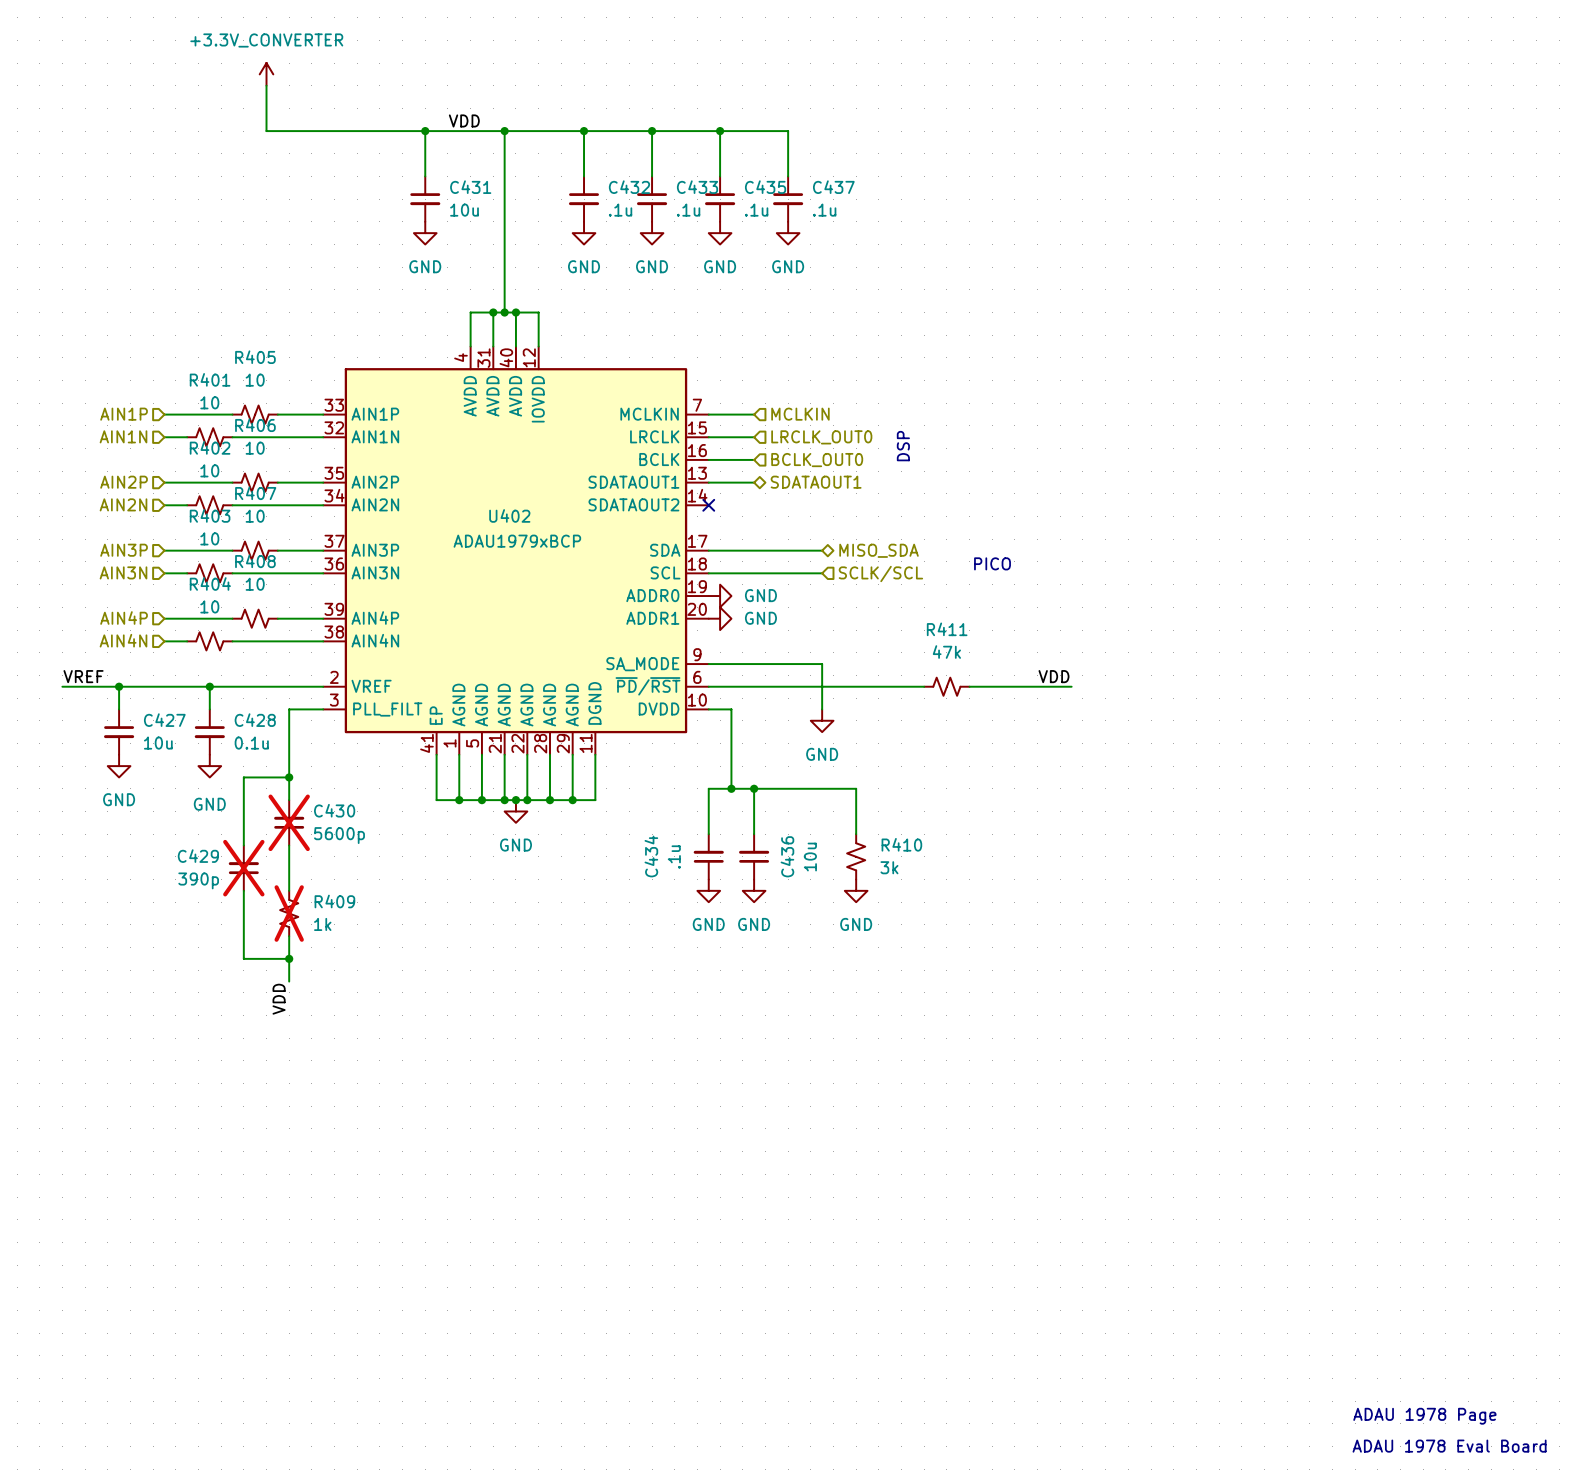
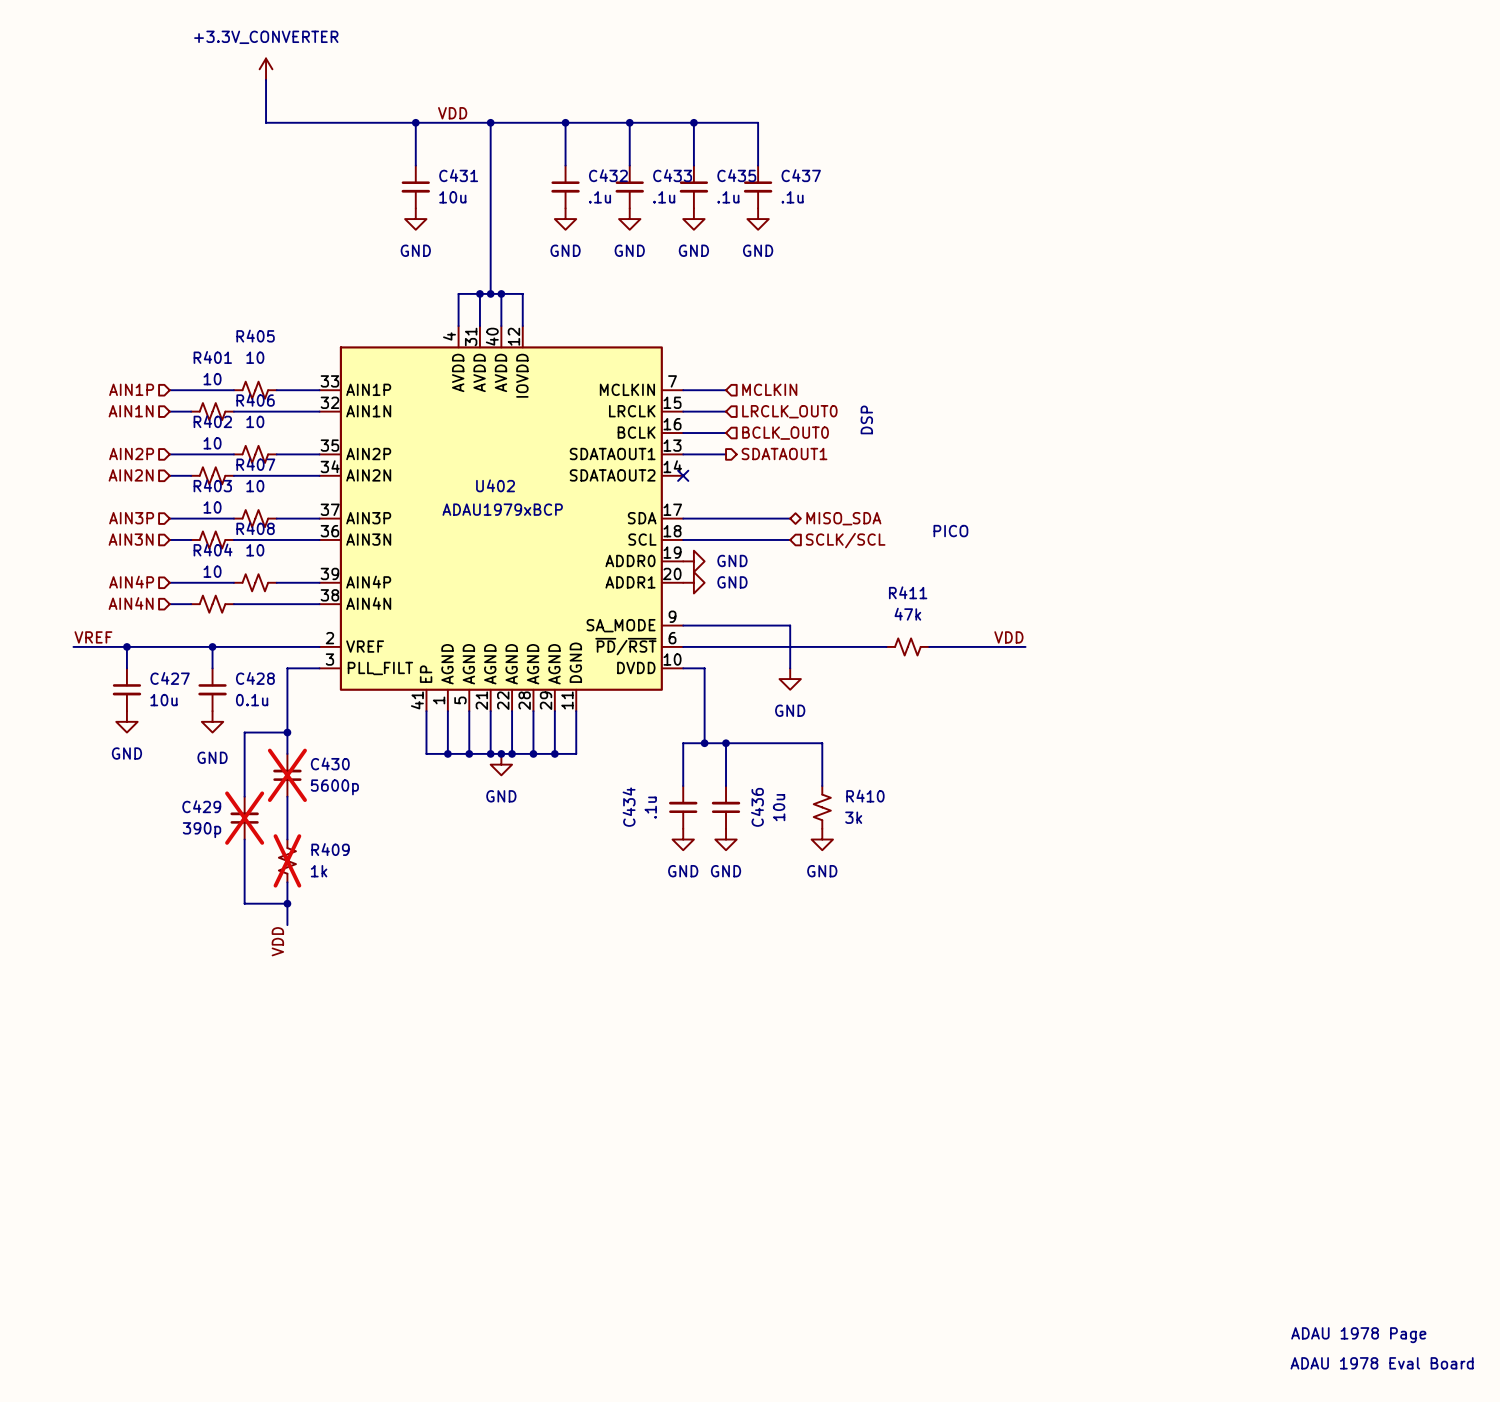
hierarchical label shape: bidirectional (816, 482) -> output (784, 454)

